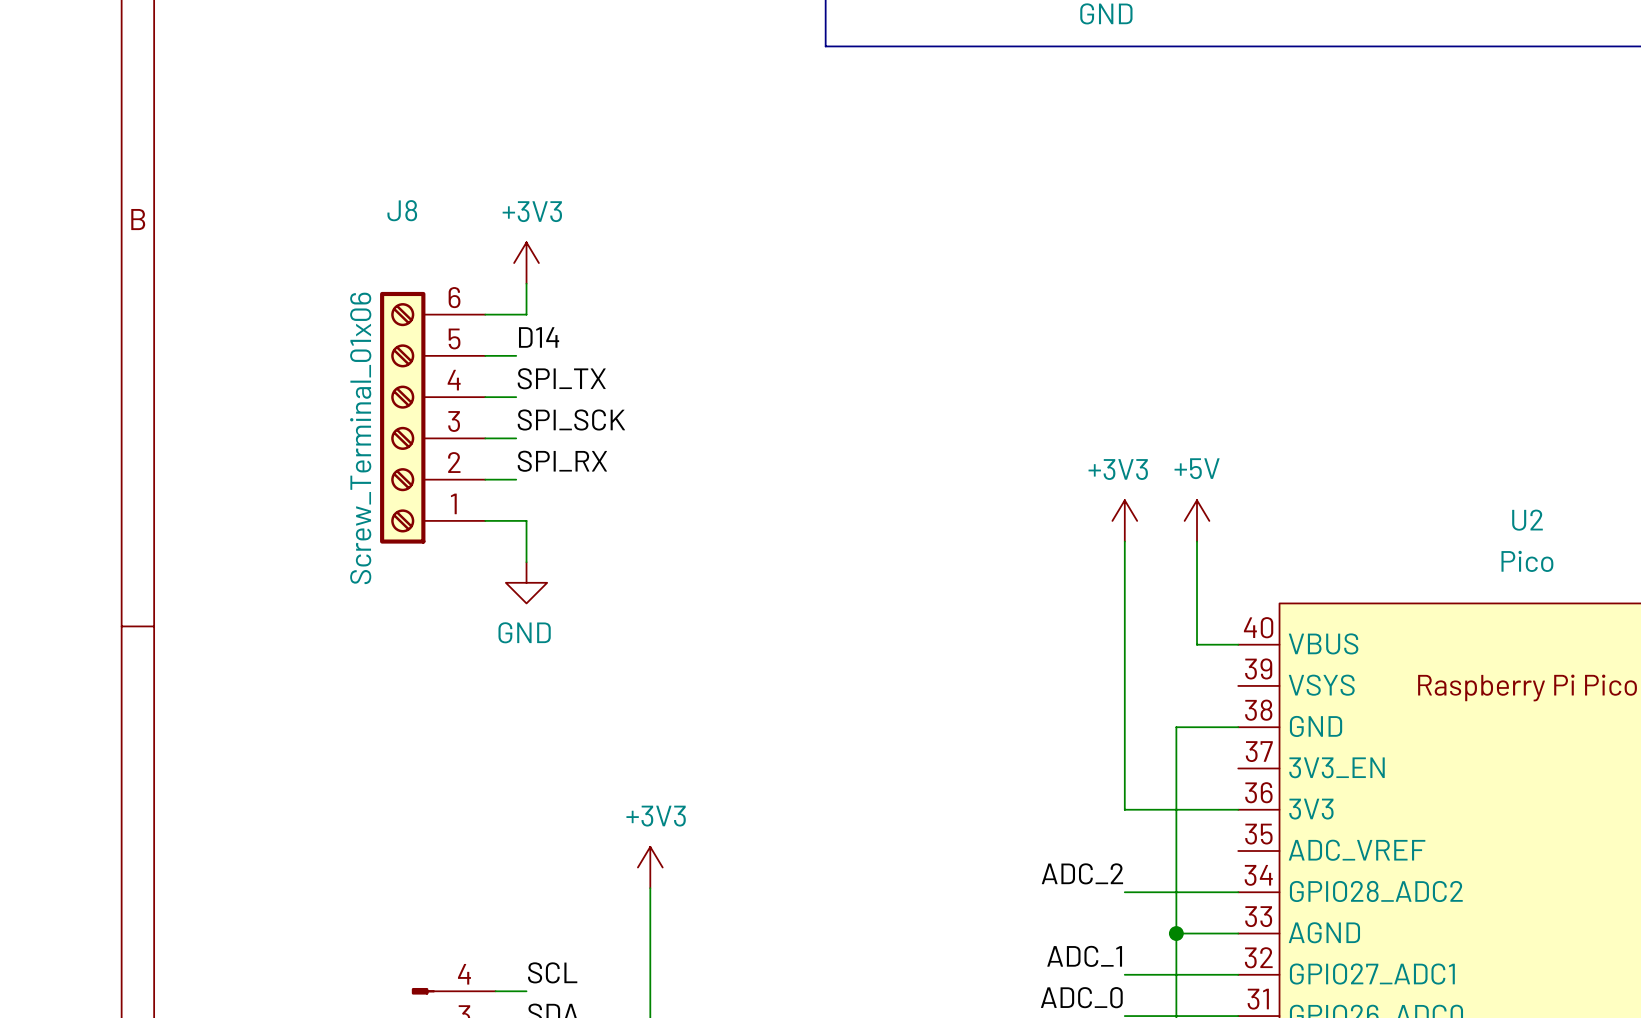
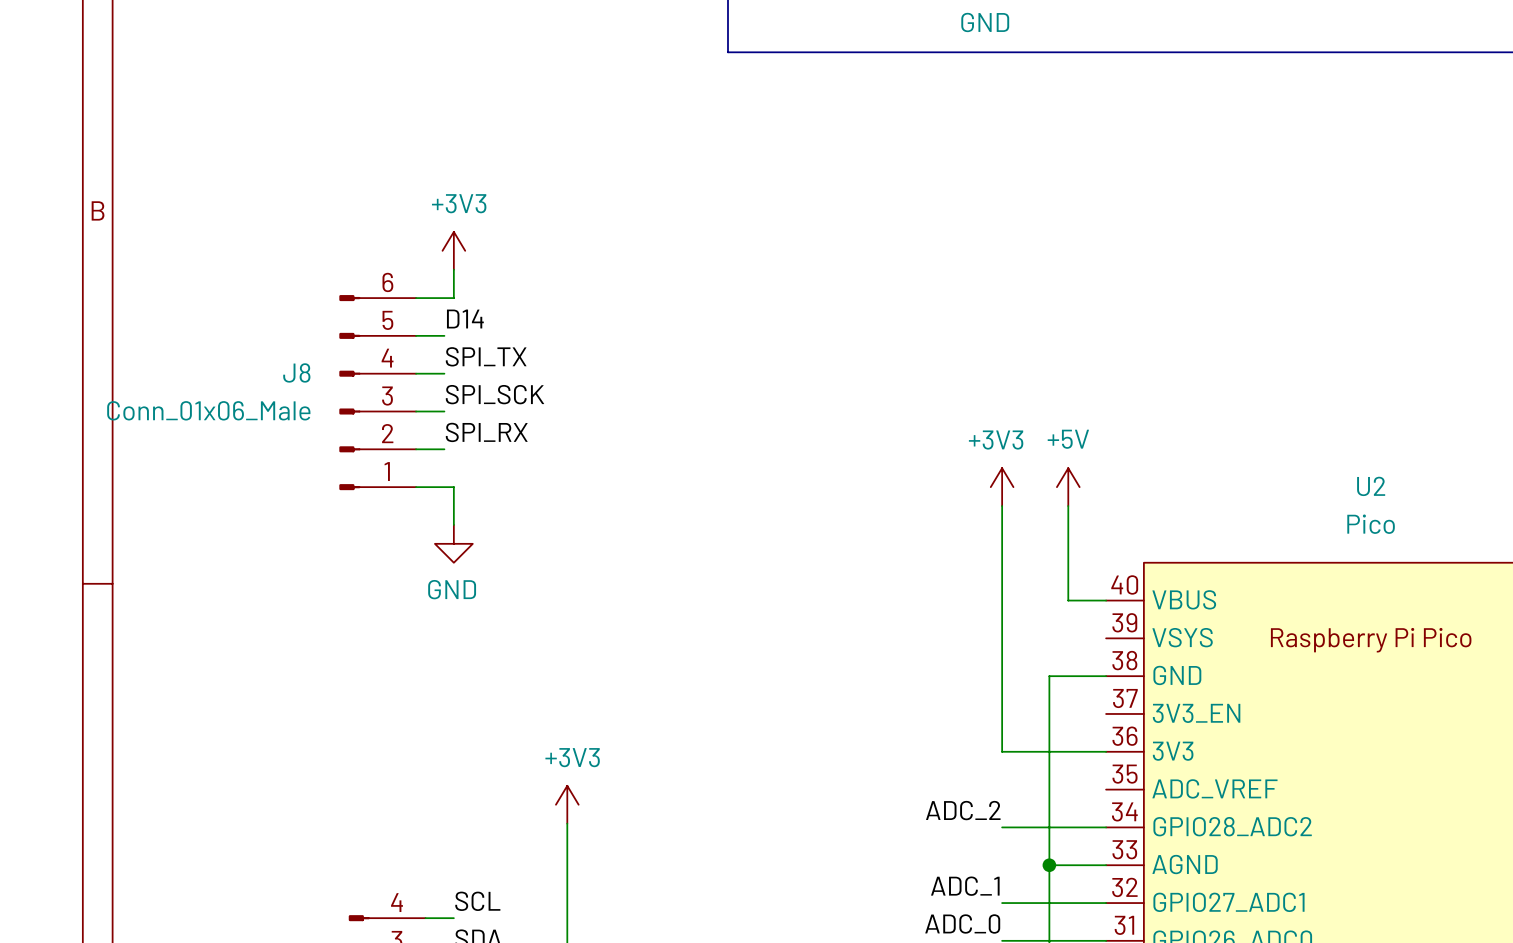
J8 name position: J8 (402, 210) -> J8 (296, 372)
J8 symbol: [380, 291, 486, 544] -> [339, 295, 417, 491]
J8 value: Screw_Terminal_01x06 (360, 438) -> Conn_01x06_Male (208, 410)

